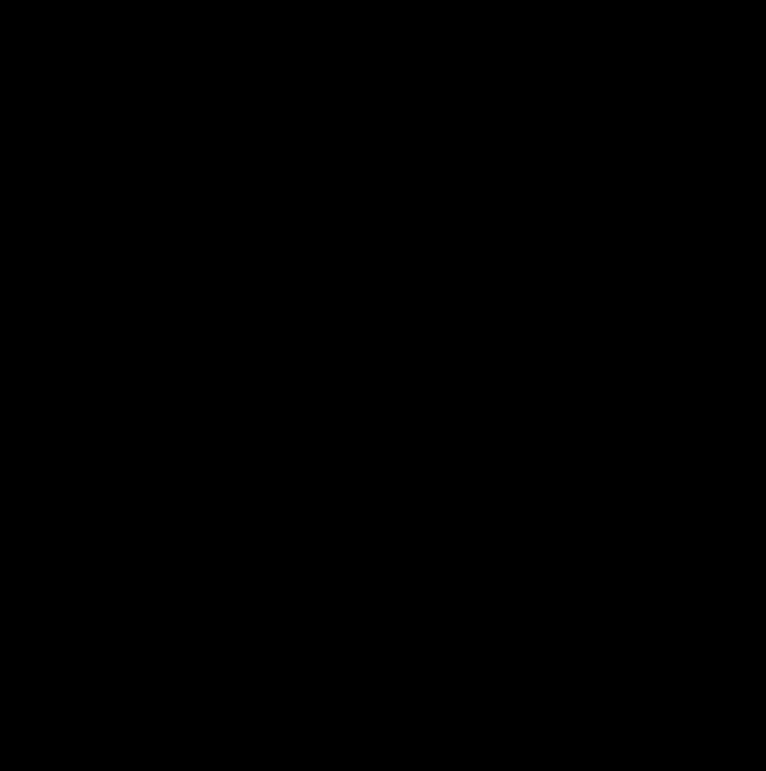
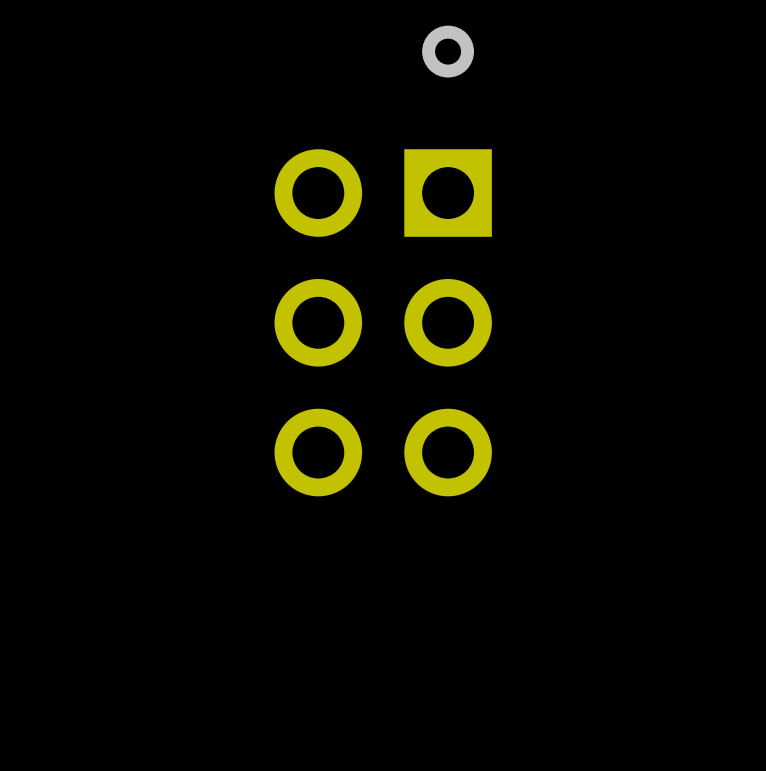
via: none -> (448, 51)
part: none -> (383, 322)

